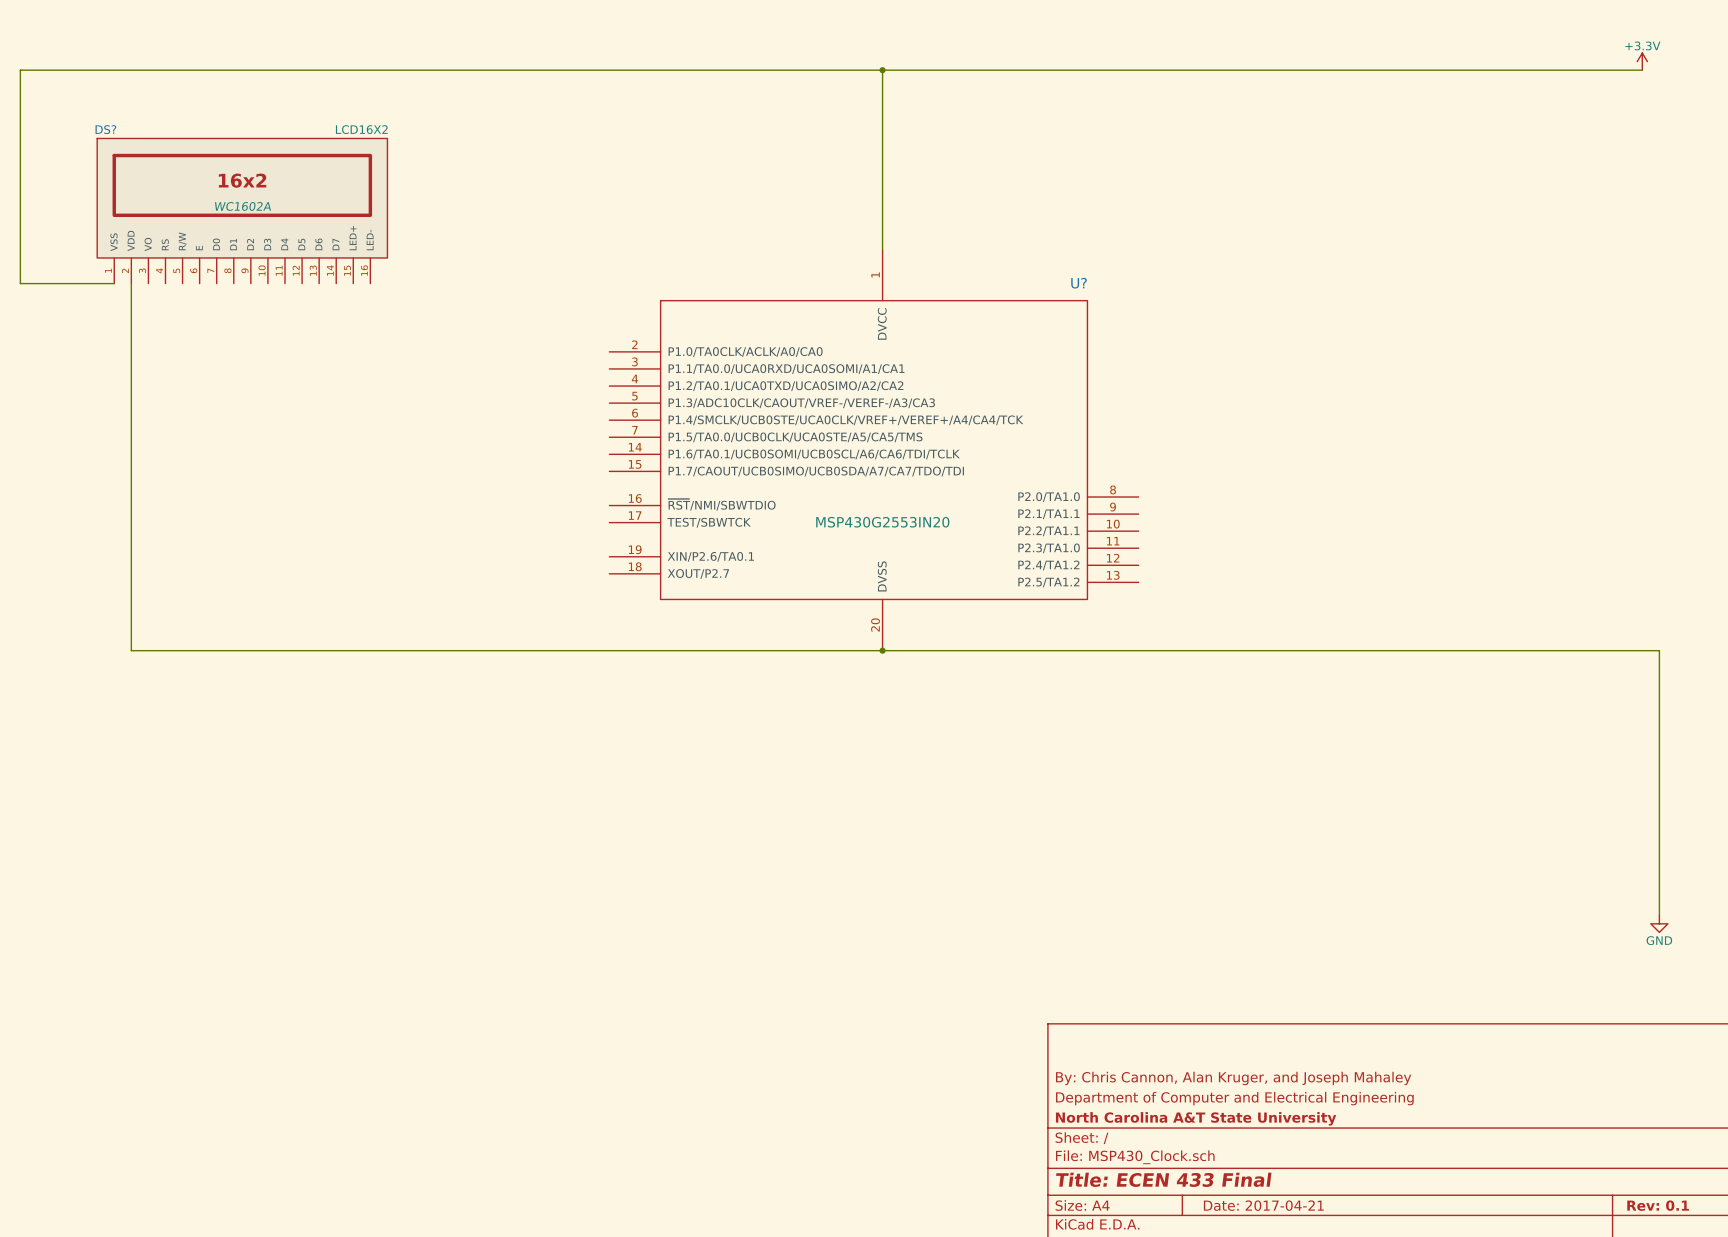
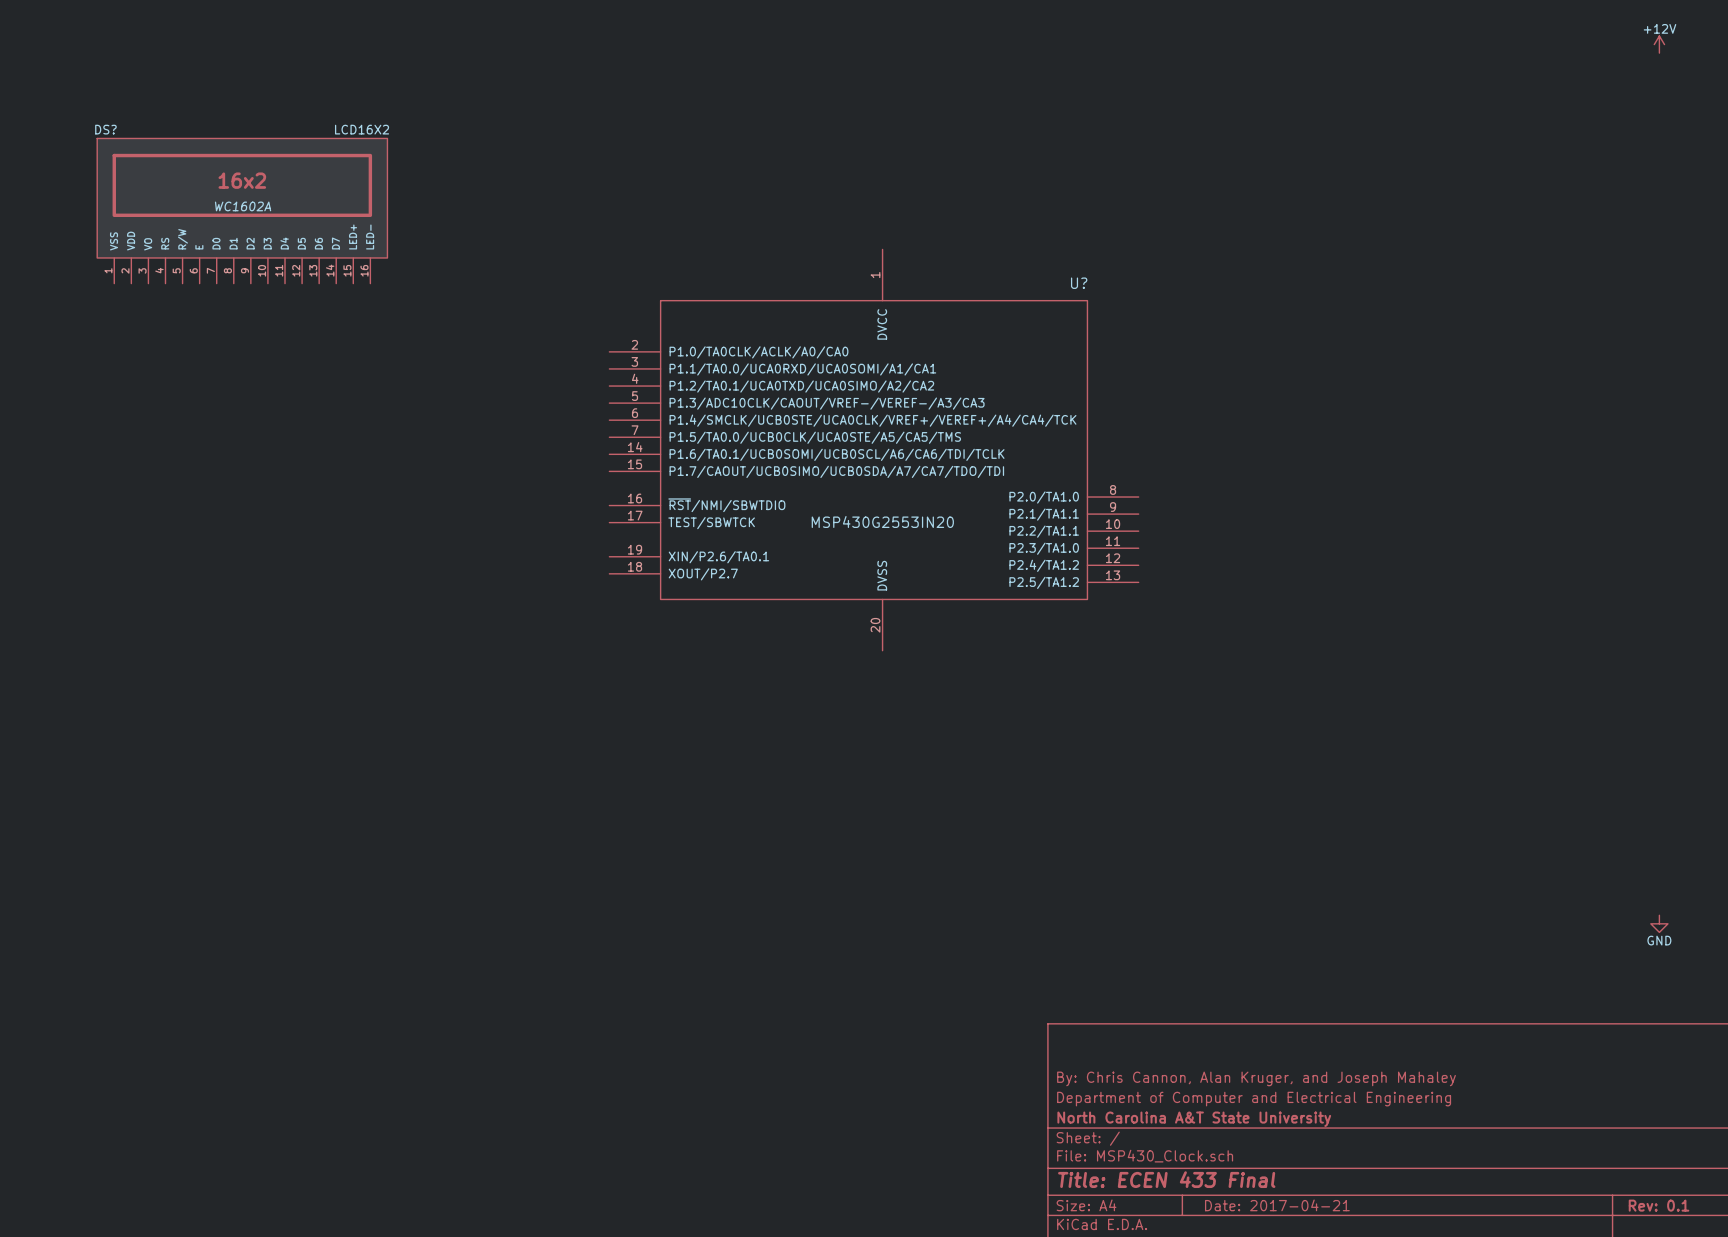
power symbol: none -> +12V (1659, 44)
power symbol: +3.3V (1642, 61) -> none
wire: (882, 70) (882, 249) -> none
junction: (882, 70) -> none
wire: (1642, 70) (20, 70) (20, 283) (114, 283) -> none
wire: (131, 283) (131, 650) (1659, 650) (1659, 915) -> none
junction: (882, 650) -> none

